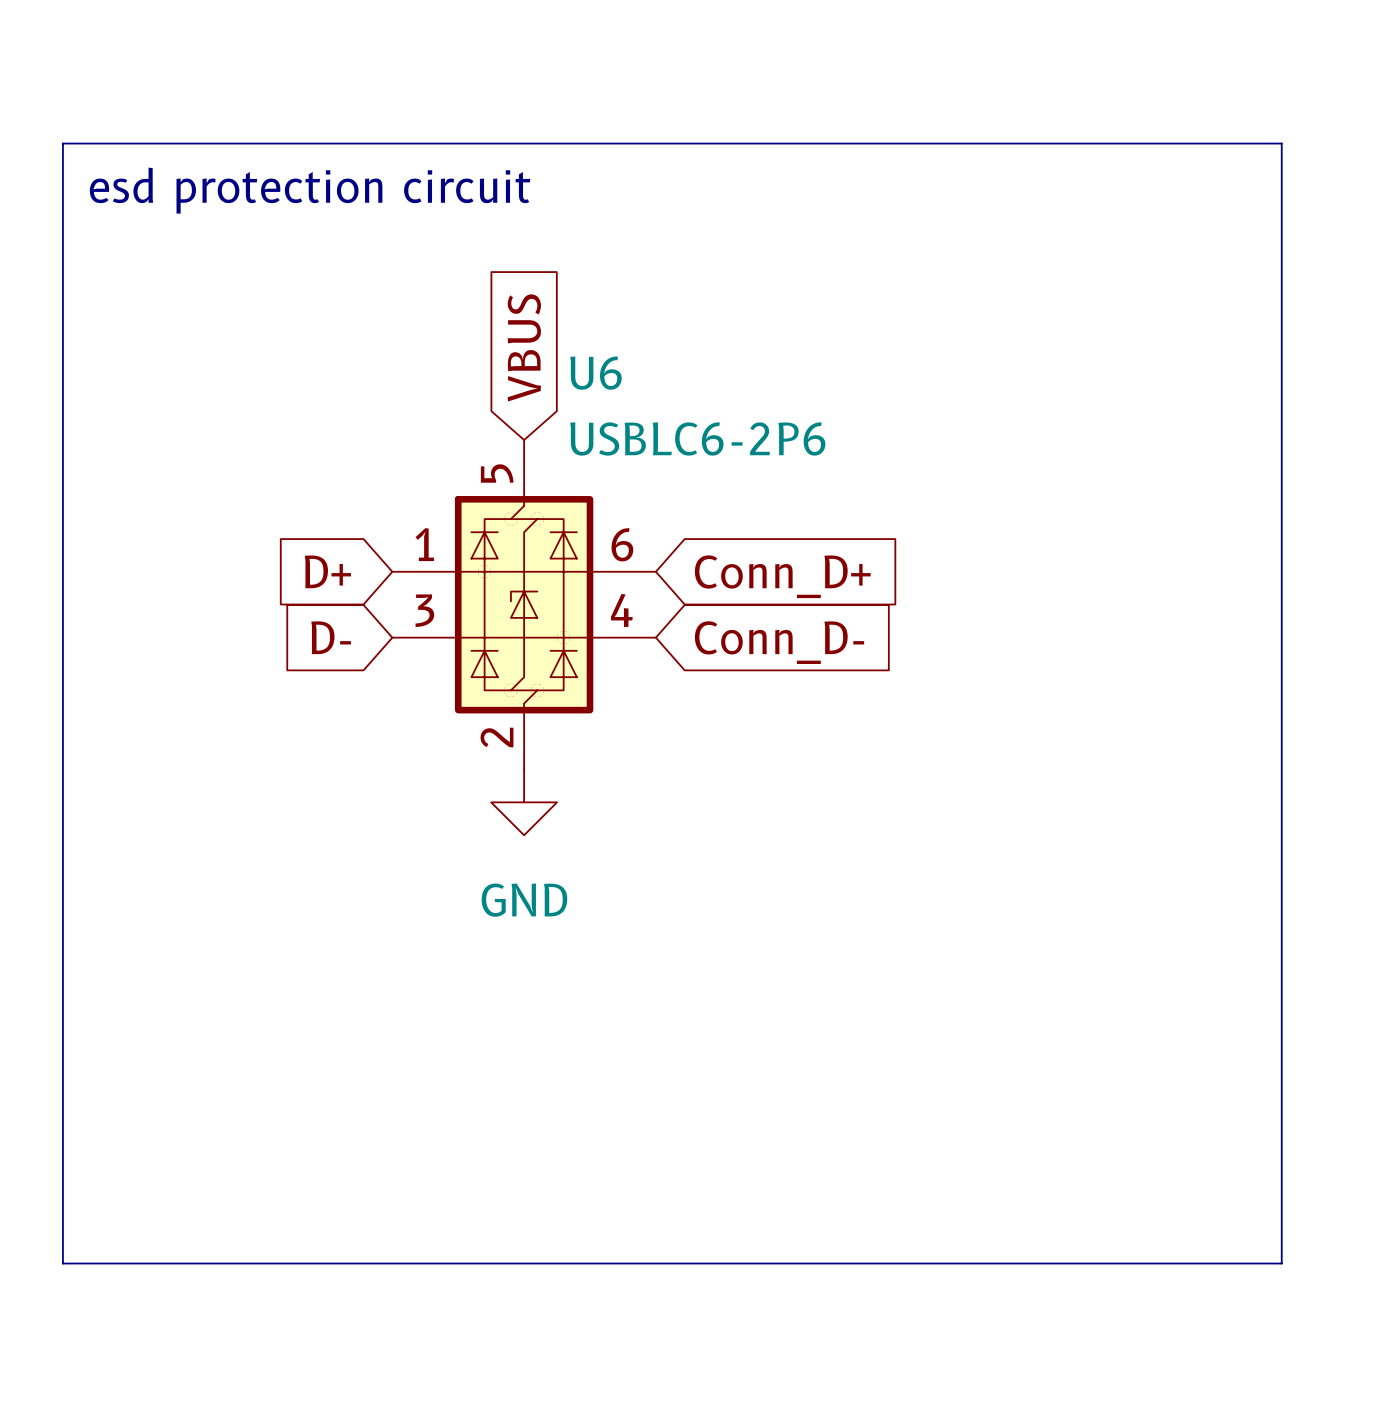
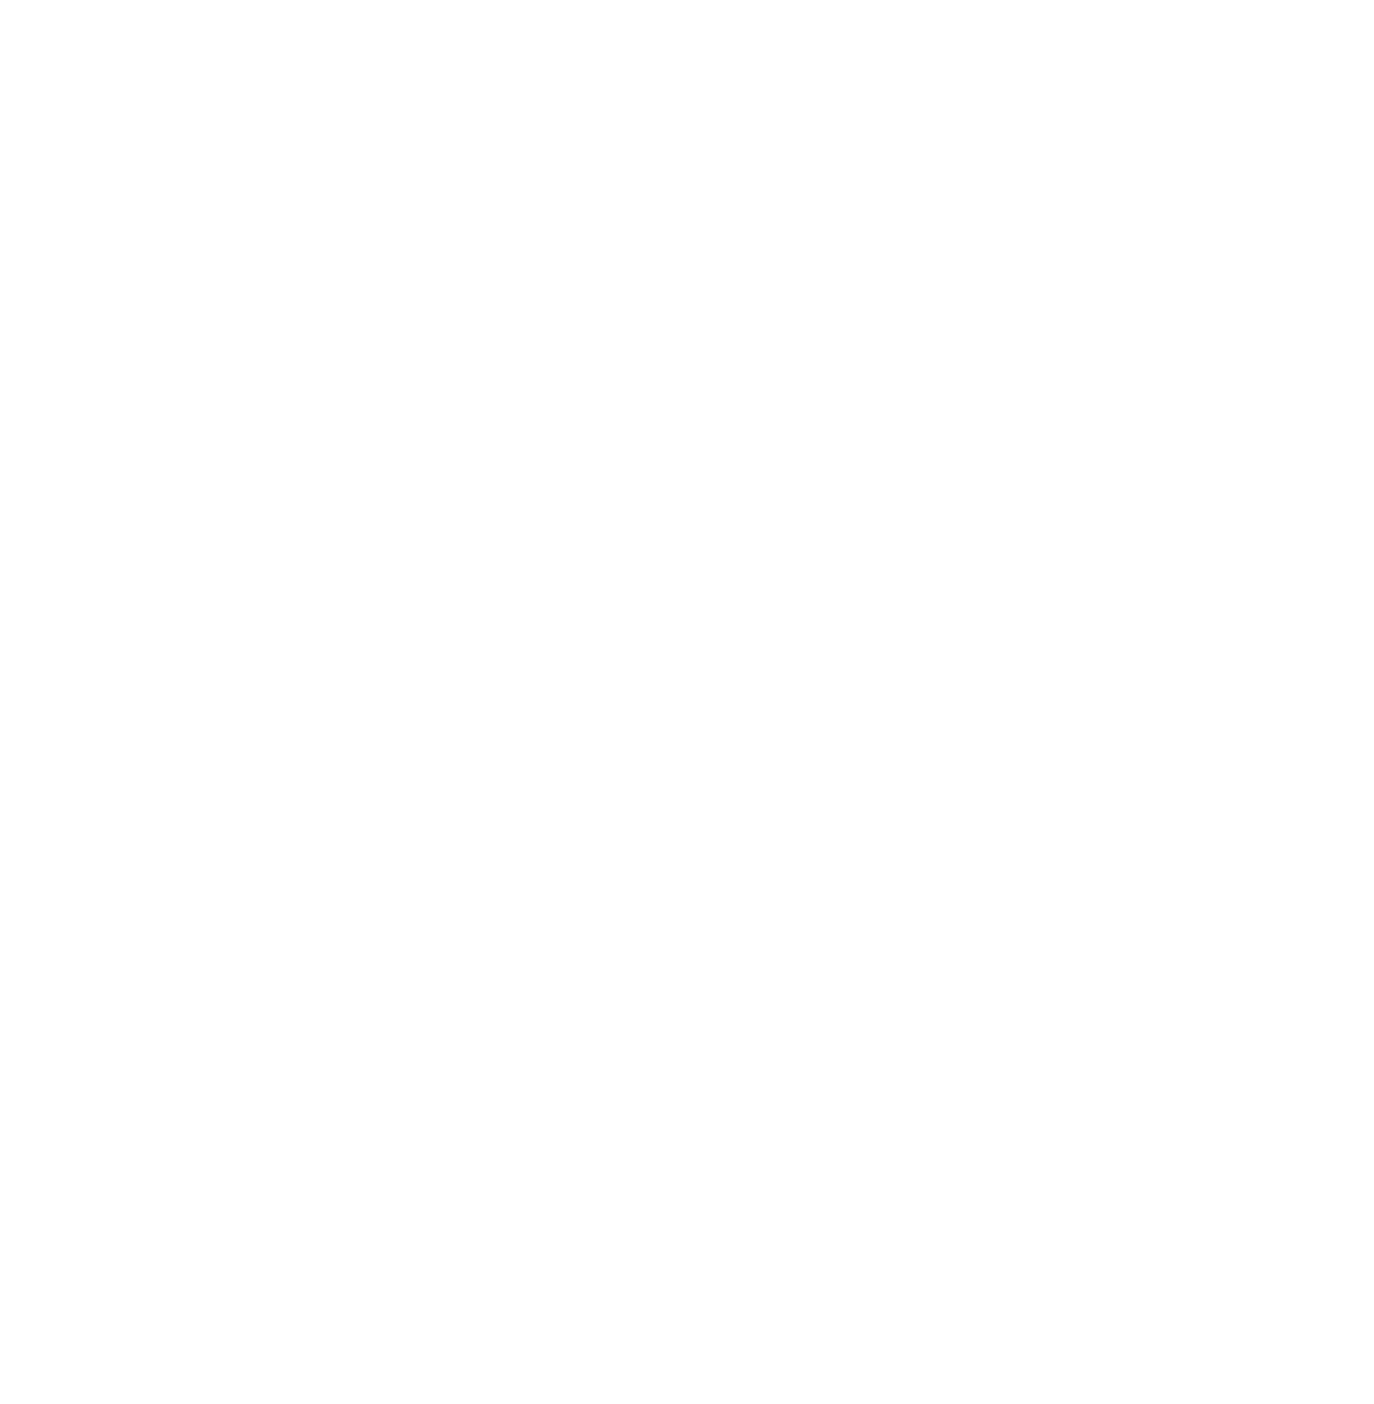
line: (62, 143) (1281, 143) (1281, 1263) (62, 1263) (62, 143) -> none
text: esd protection circuit (310, 190) -> none
global label: VBUS (524, 347) -> none
global label: D+ (327, 571) -> none
global label: Conn_D+ (782, 576) -> none
U6: USBLC6-2P6 (524, 604) -> none
global label: D- (331, 637) -> none
global label: Conn_D- (779, 642) -> none
power symbol: GND (524, 802) -> none

